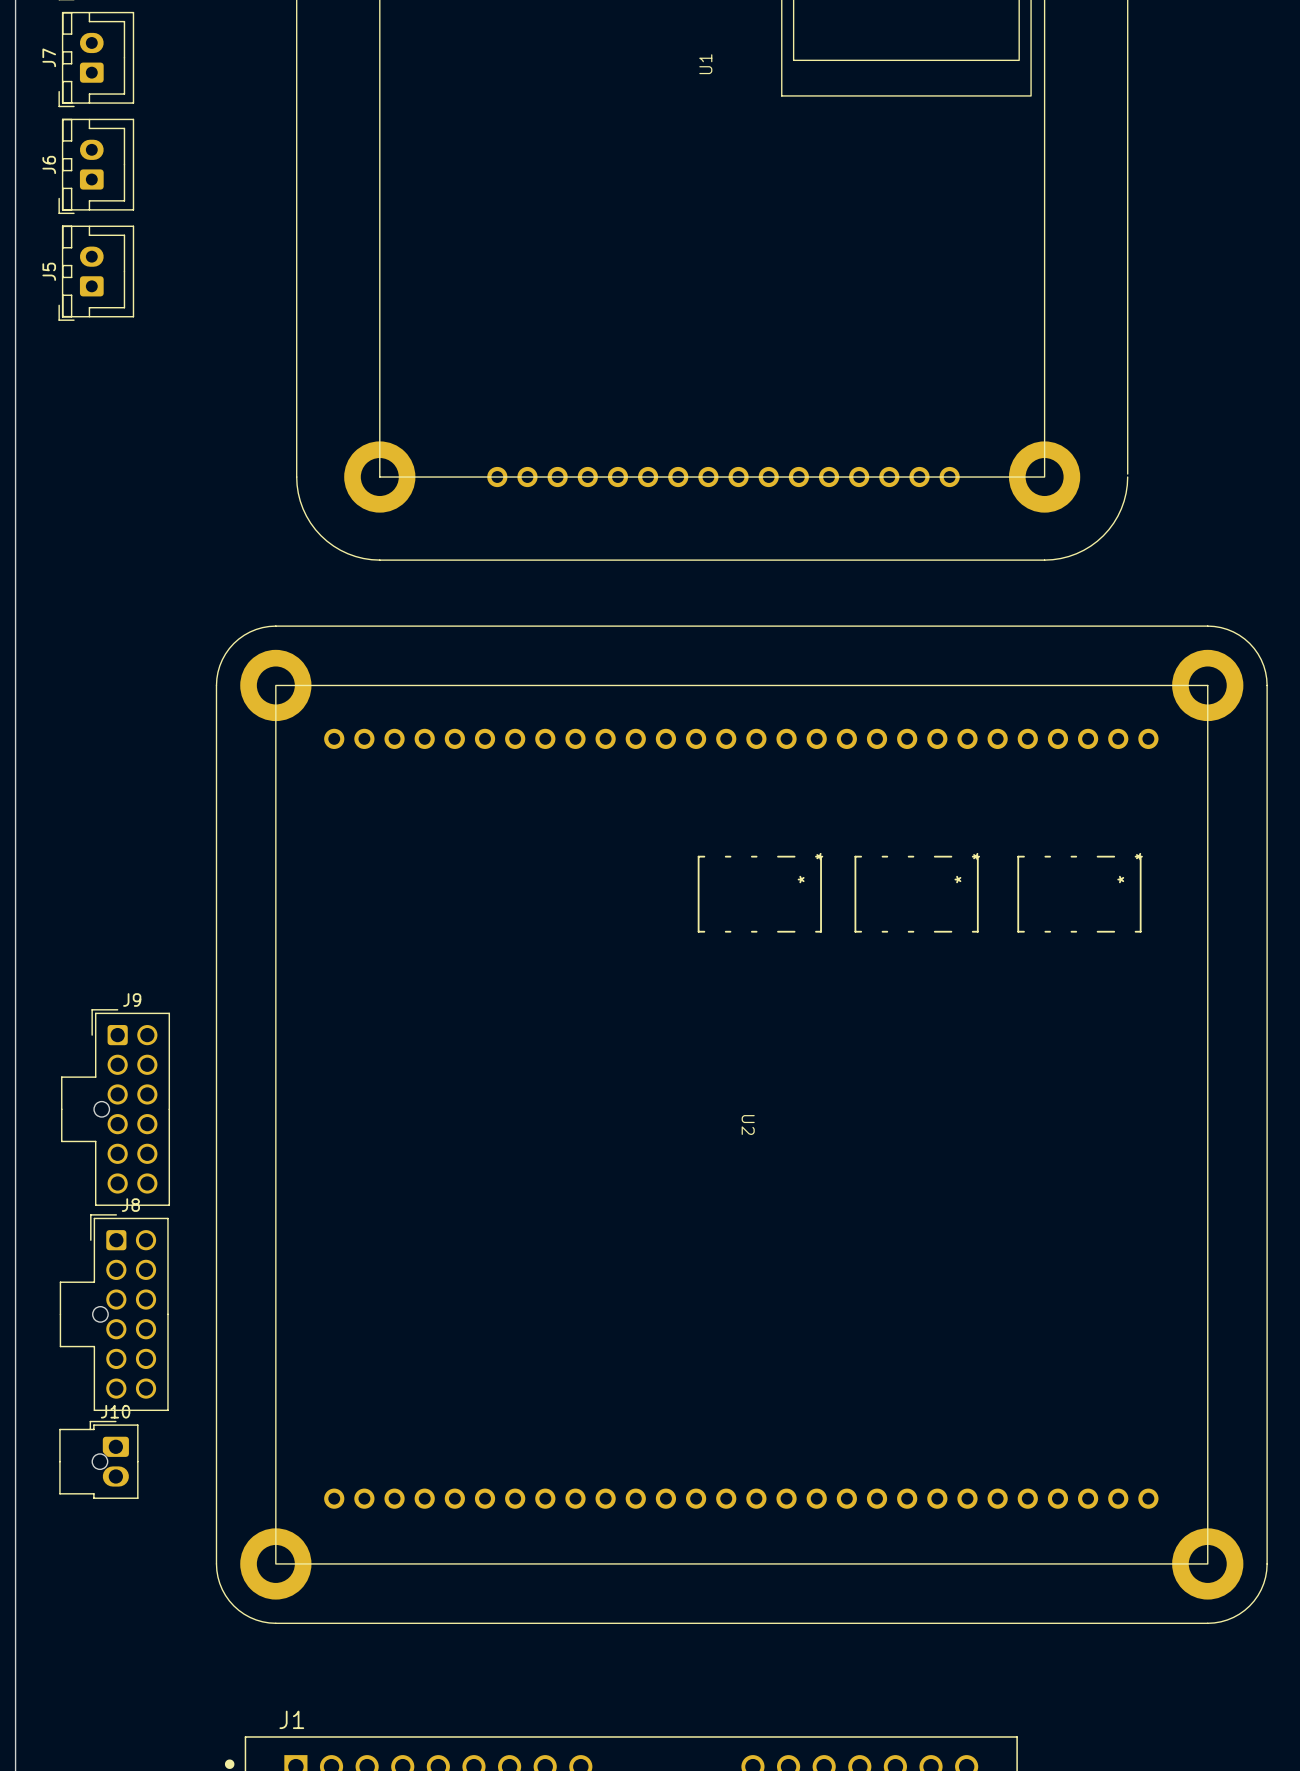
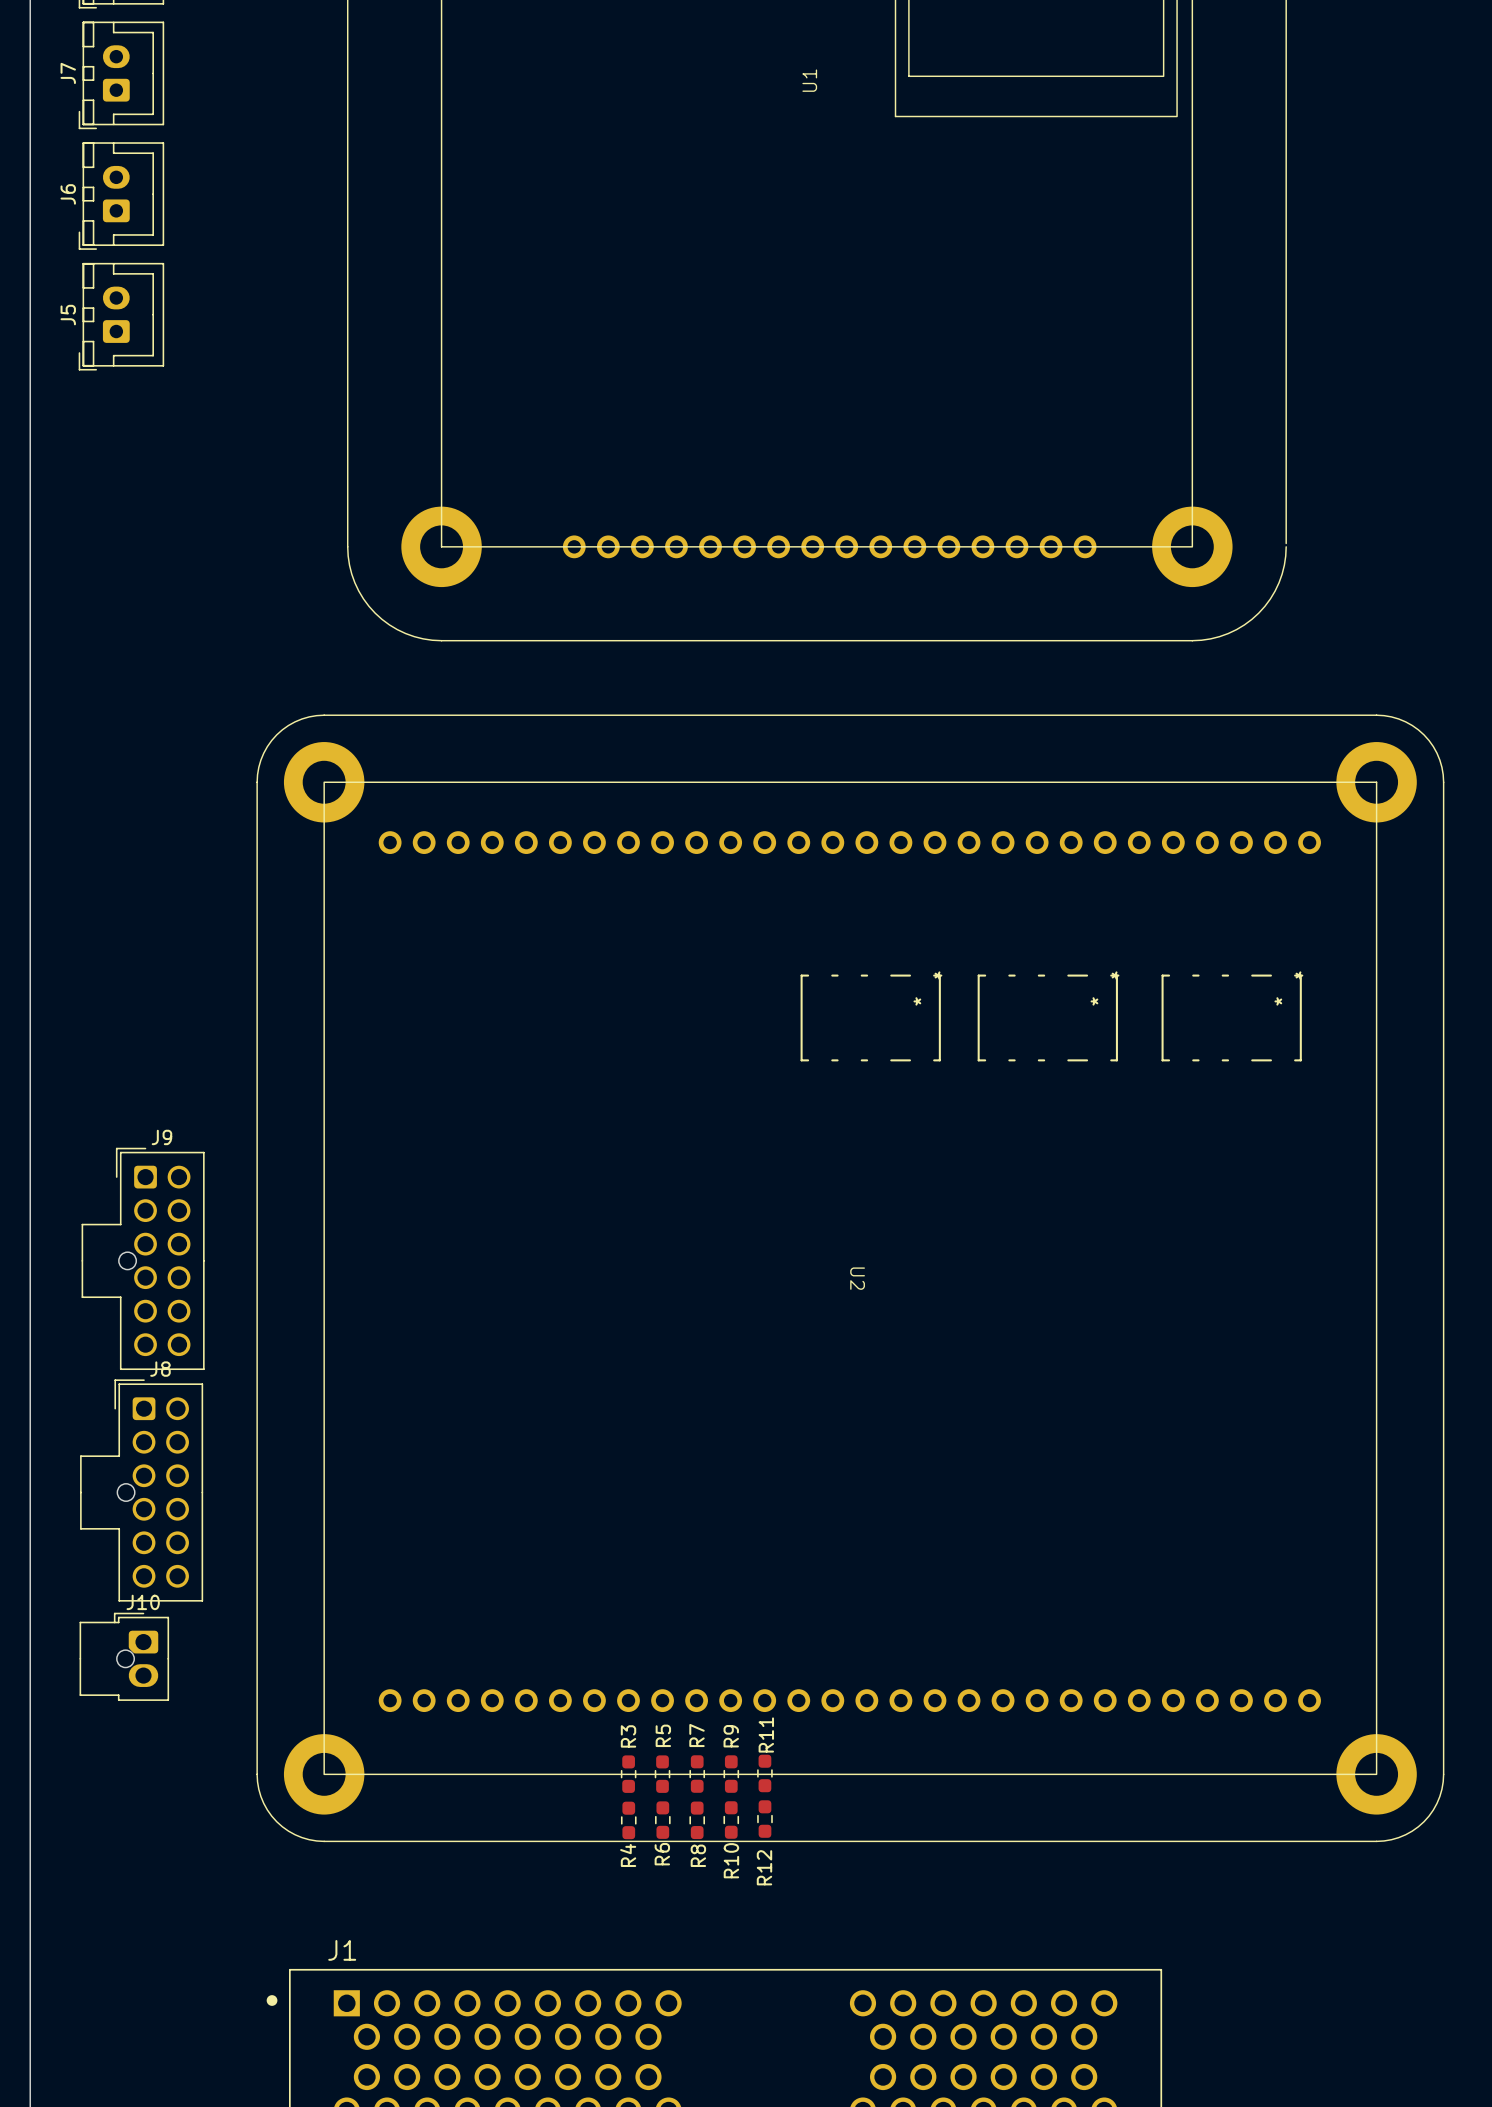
R3: none -> (628, 1774)
R5: none -> (662, 1774)
R7: none -> (697, 1774)
R9: none -> (731, 1774)
R11: none -> (764, 1773)
R12: none -> (764, 1819)
R4: none -> (628, 1820)
R6: none -> (662, 1820)
R8: none -> (697, 1820)
R10: none -> (731, 1820)

